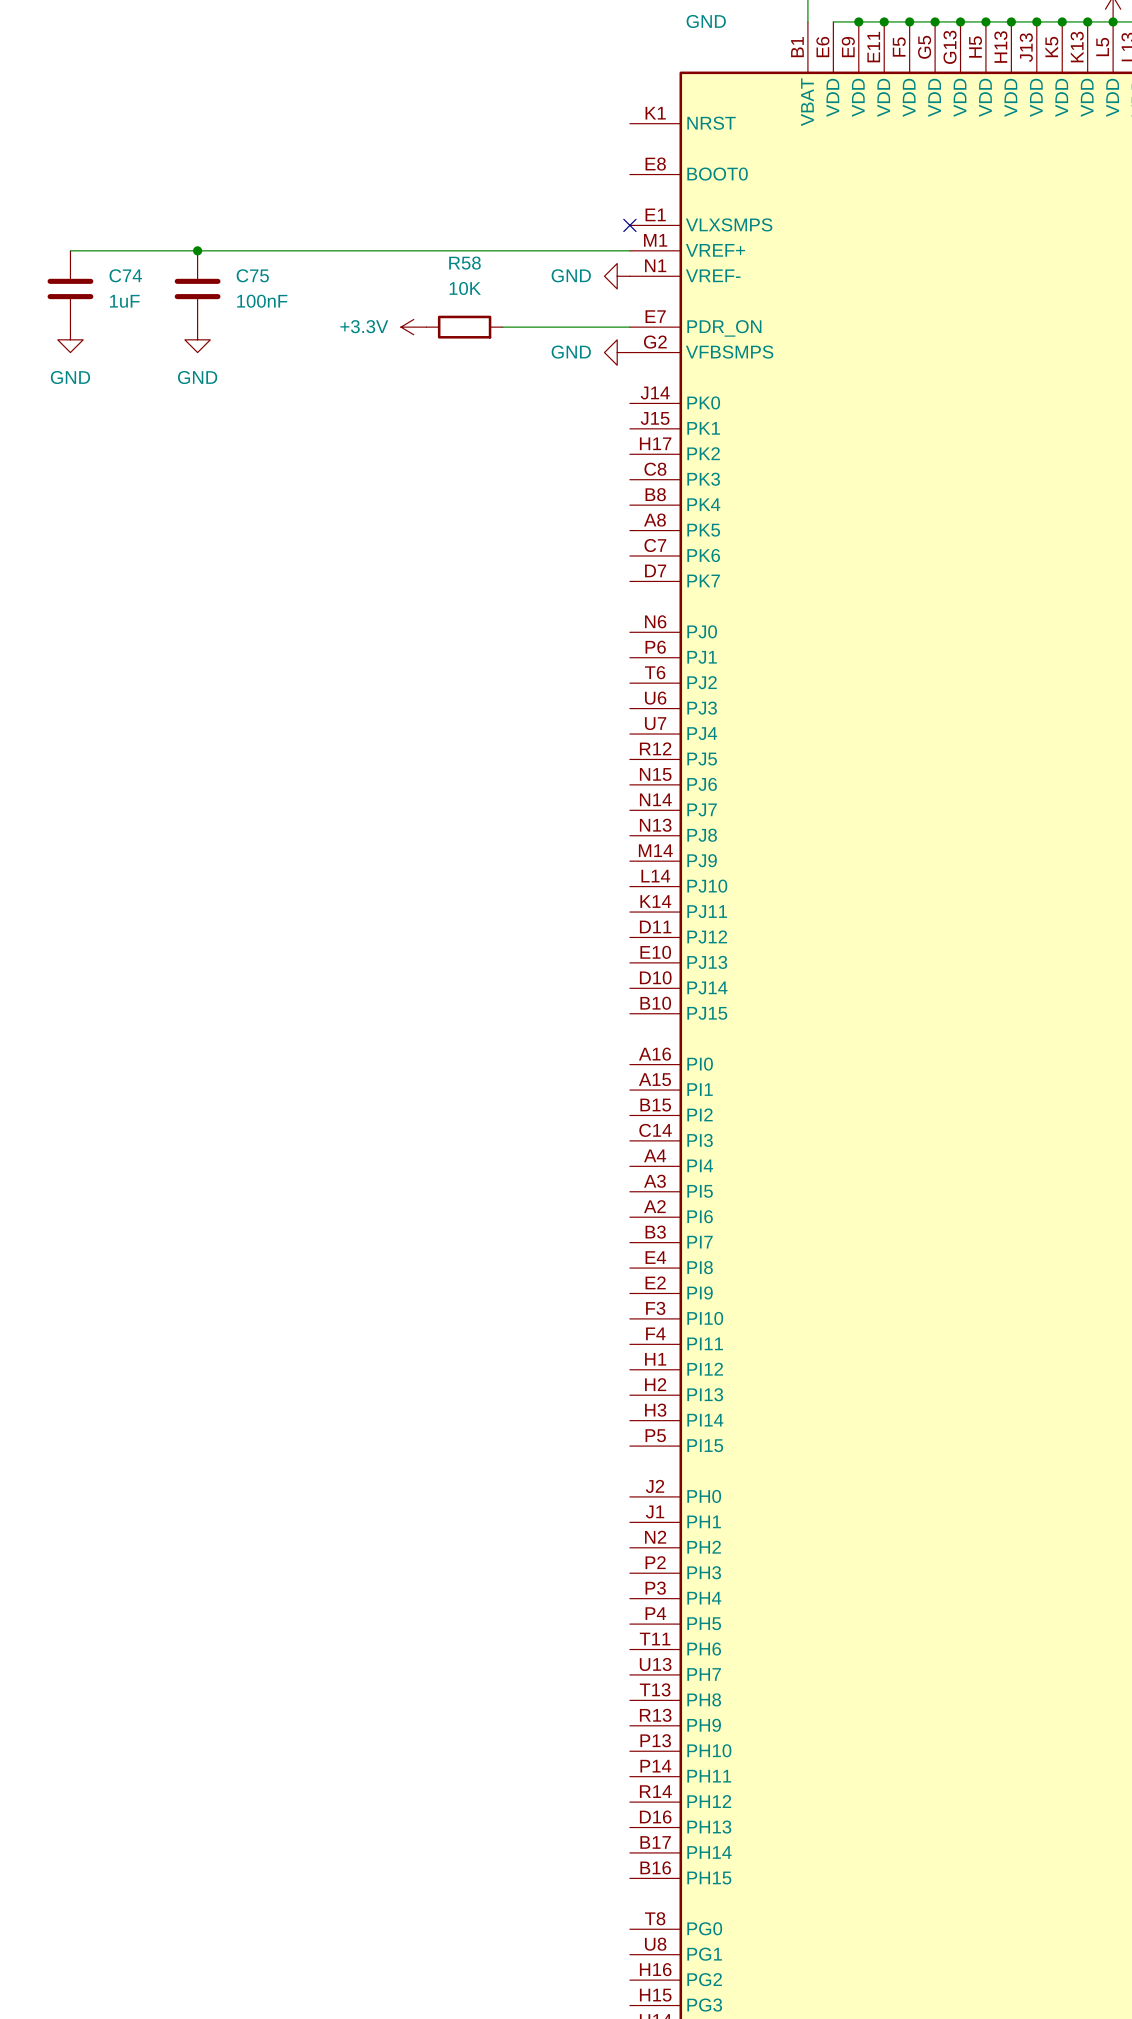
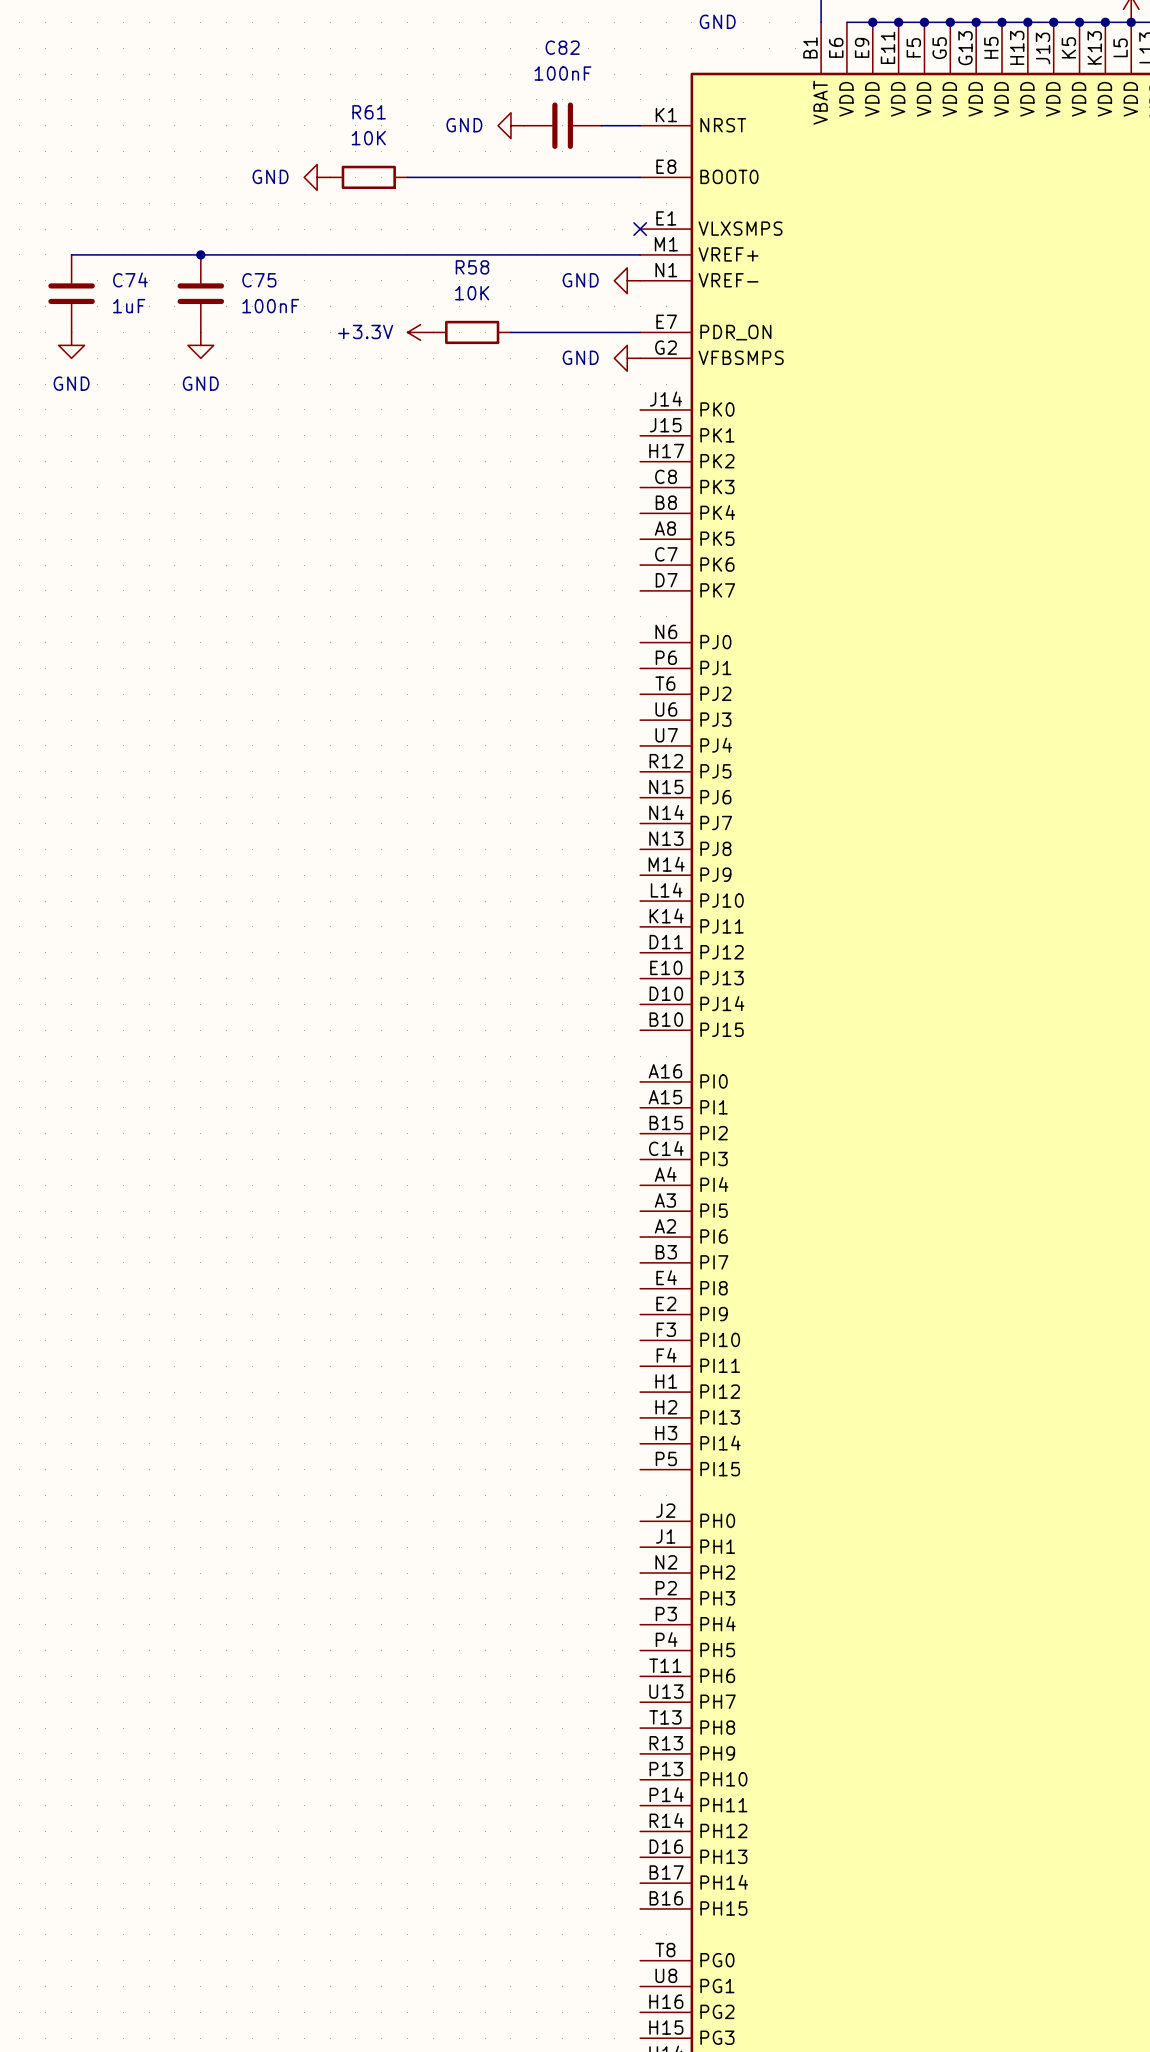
power symbol: none -> GND (510, 125)
C82: none -> 100nF (562, 125)
wire: none -> (601, 125) (640, 125)
power symbol: none -> GND (317, 177)
R61: none -> 10K (368, 177)
wire: none -> (407, 177) (640, 177)

